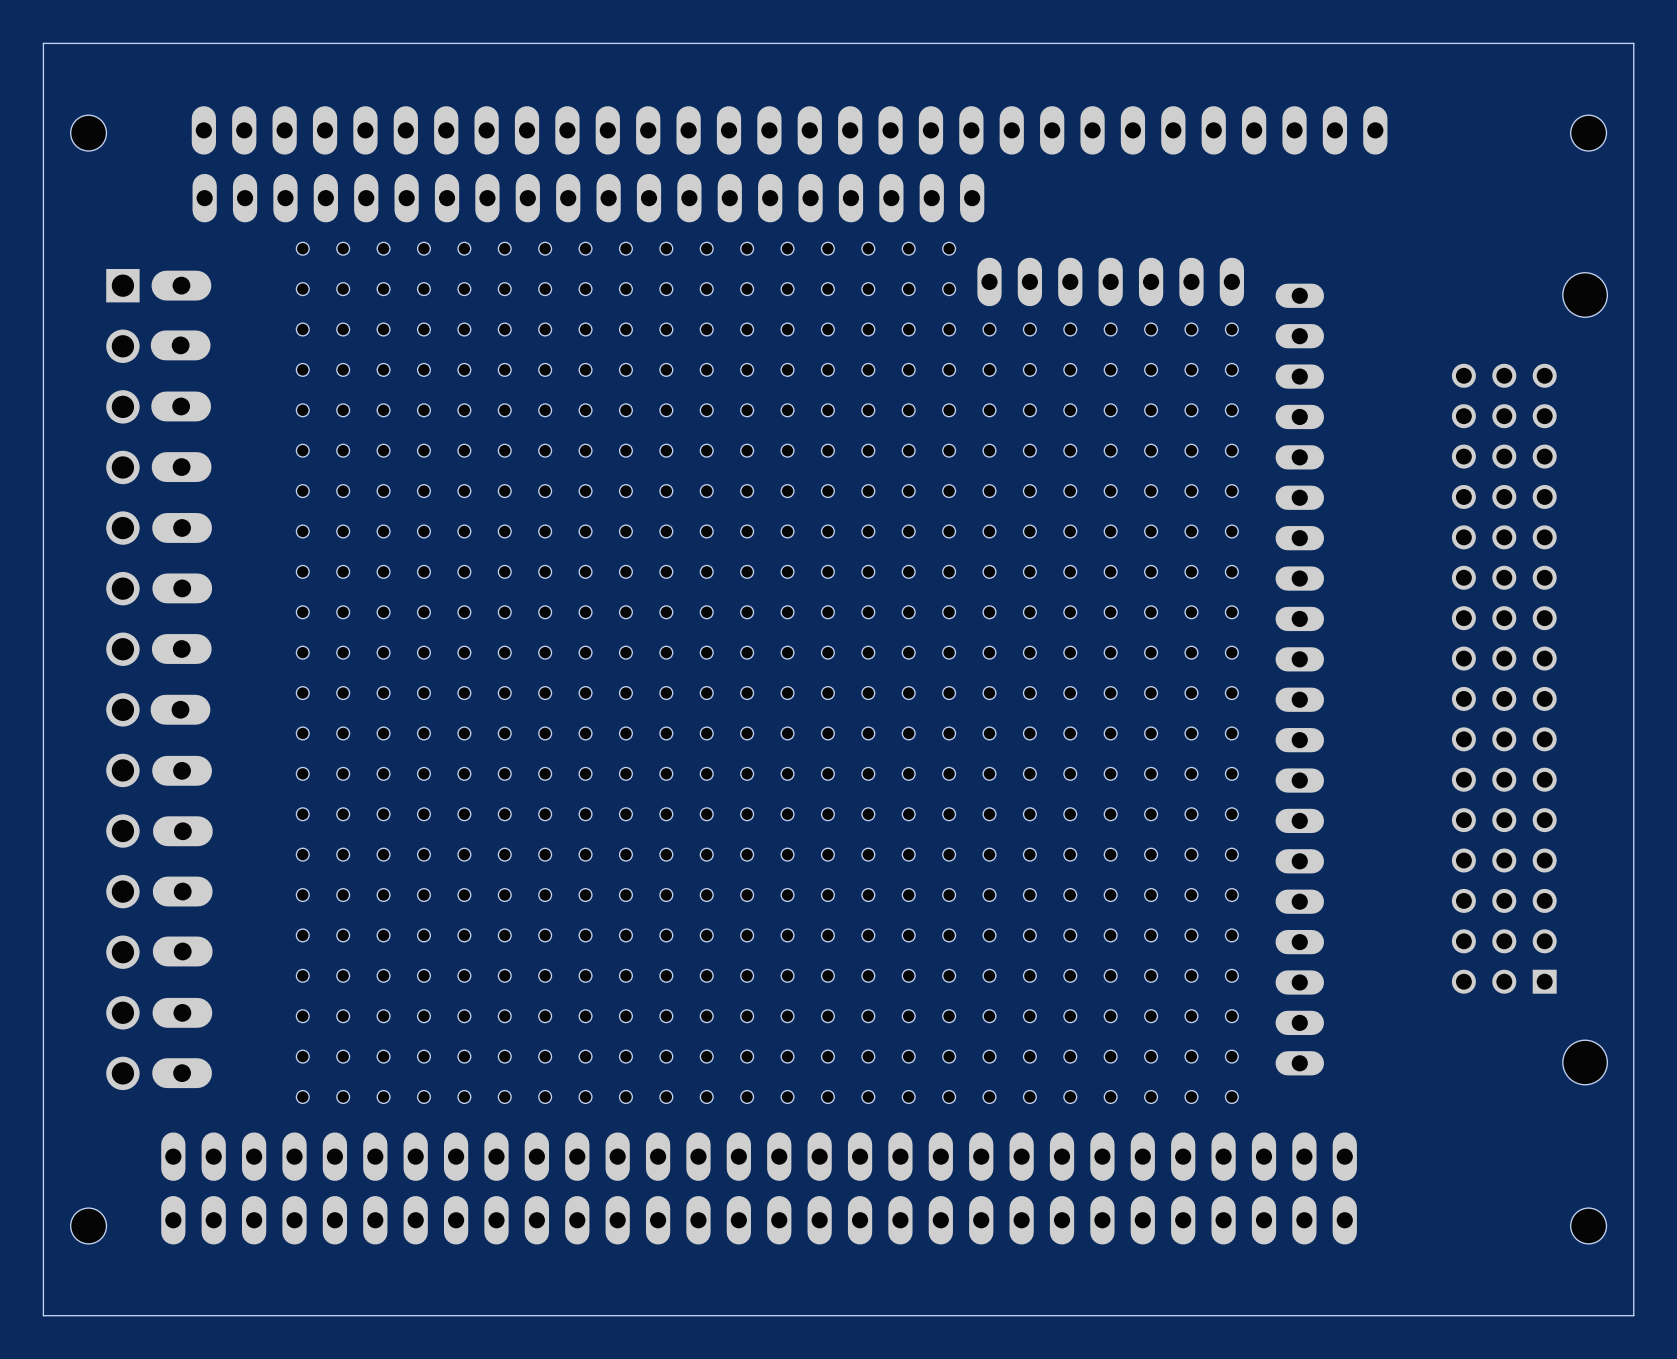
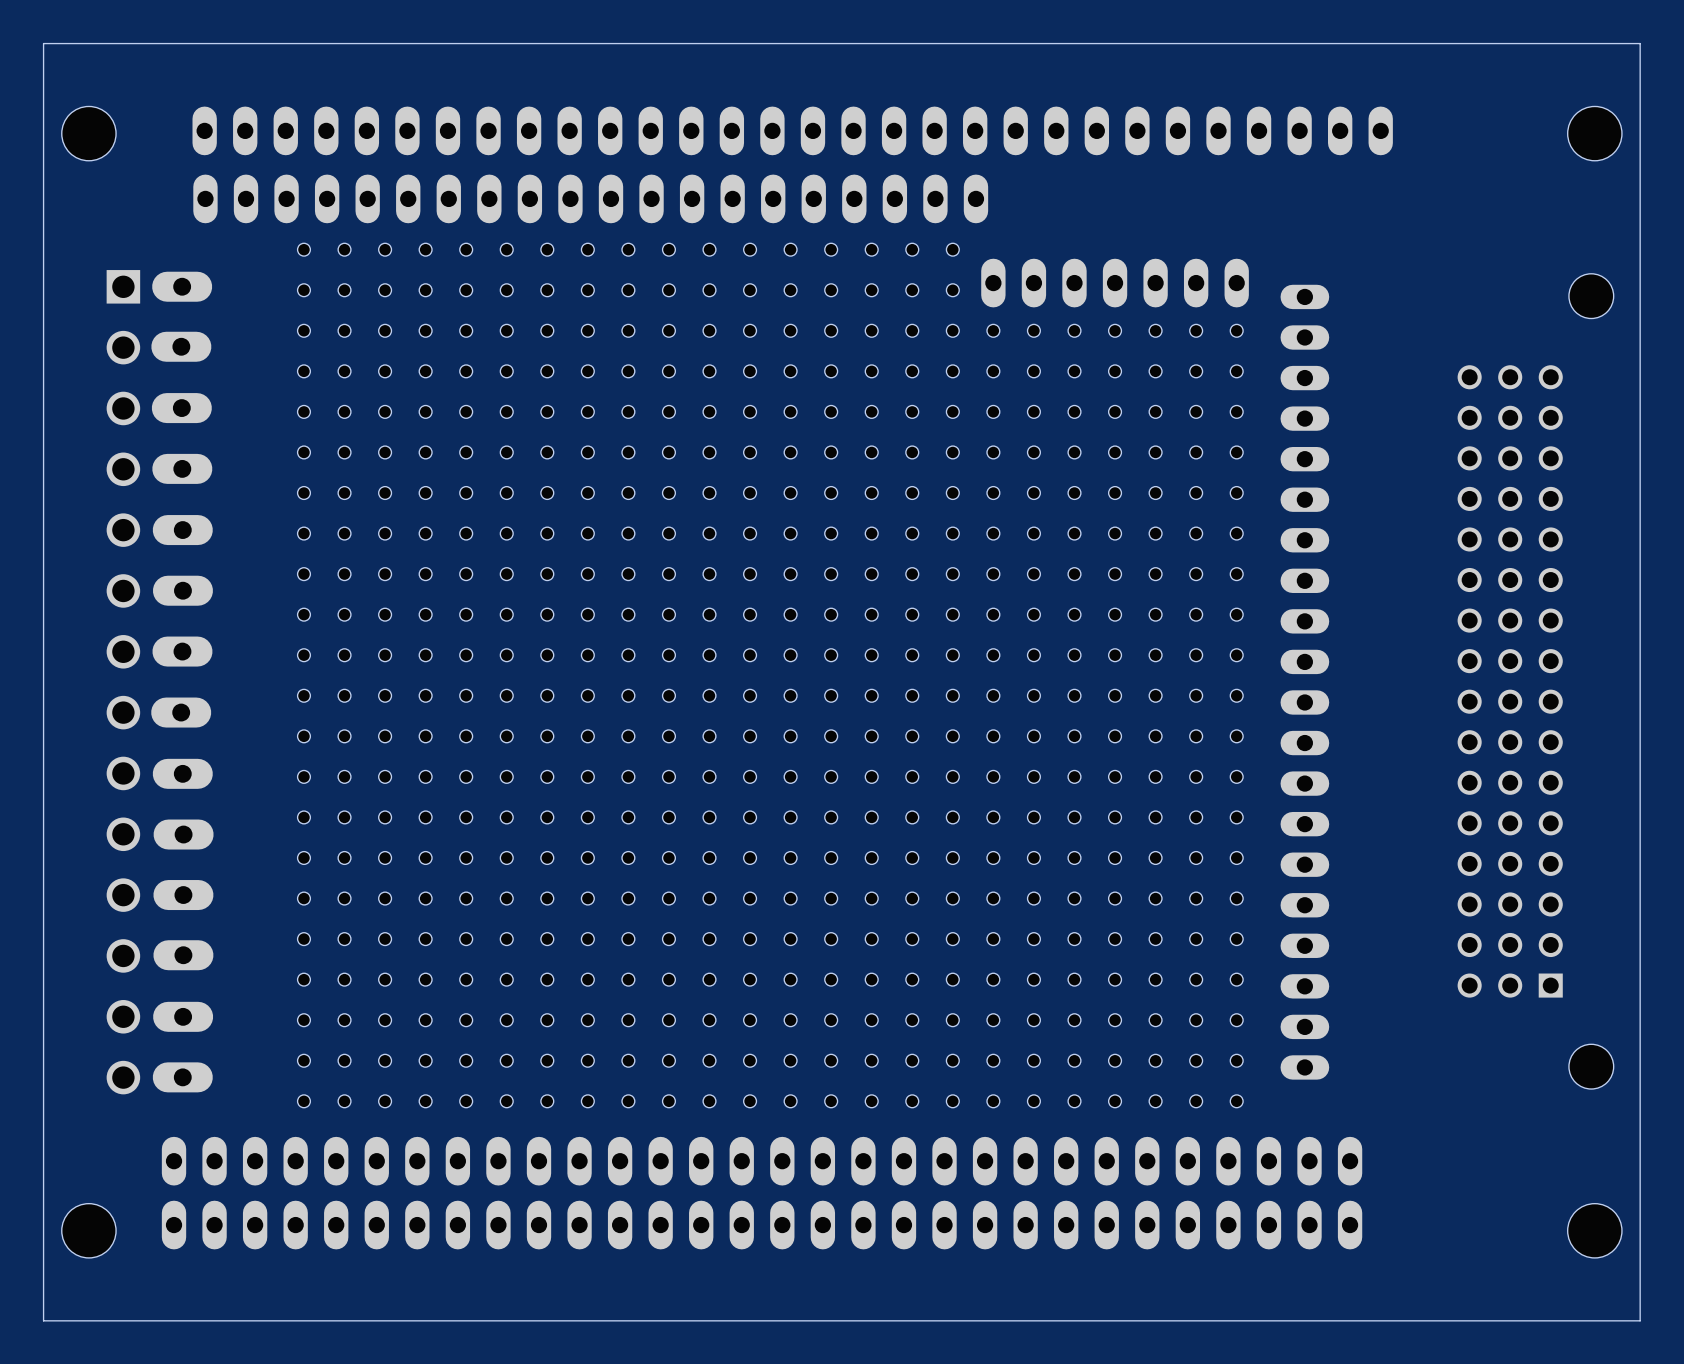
hole size: [70, 115, 107, 151] -> [61, 106, 117, 161]
hole size: [1570, 115, 1607, 151] -> [1567, 106, 1622, 161]
hole size: [70, 1208, 107, 1244] -> [61, 1203, 117, 1258]
hole size: [1570, 1208, 1607, 1244] -> [1567, 1203, 1622, 1258]

